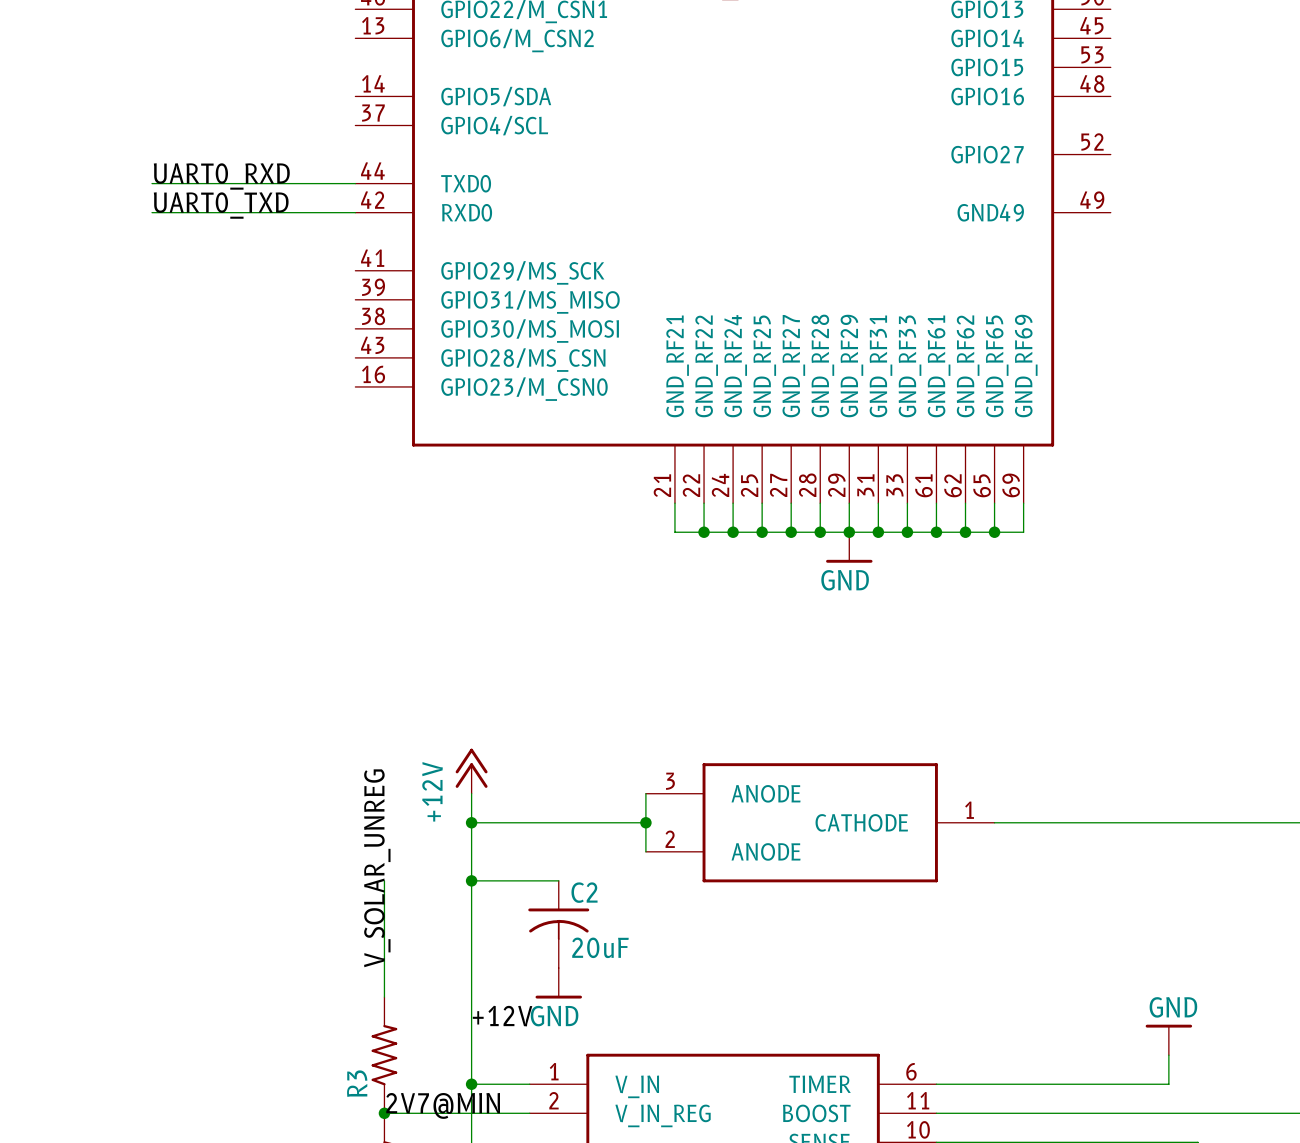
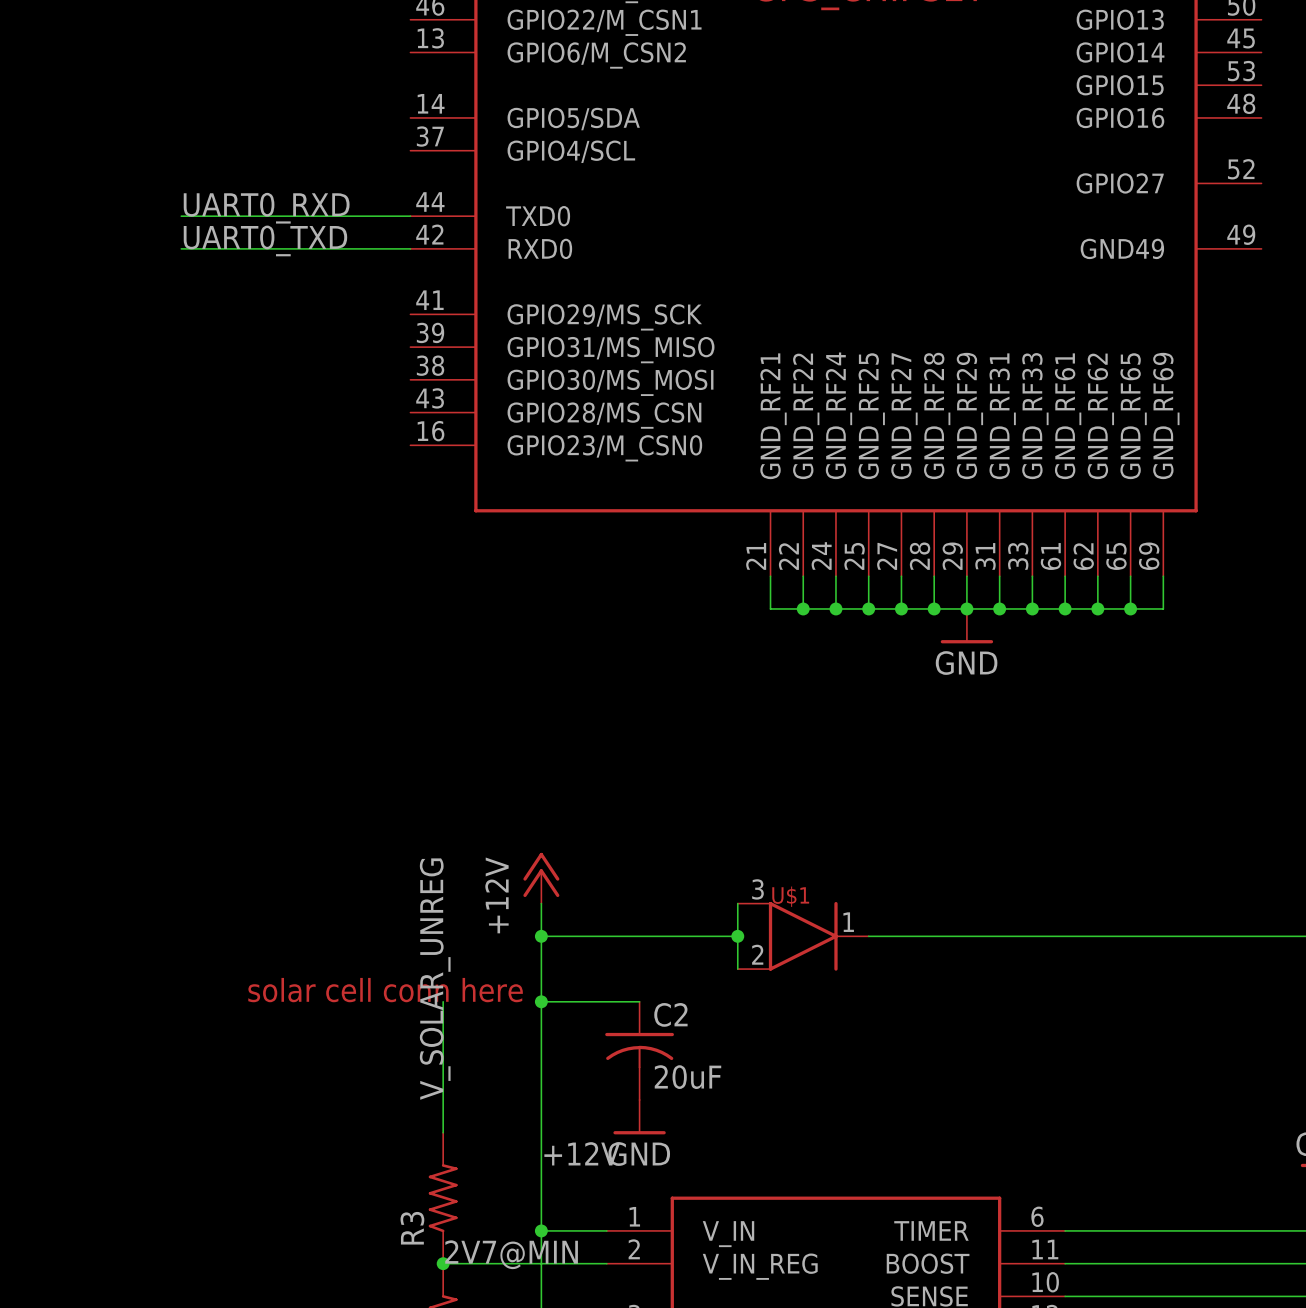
U$1: none -> (803, 936)
wire: none -> (868, 936) (1130, 936)
part: (820, 822) -> none
text: none -> solar cell conn here (385, 990)

